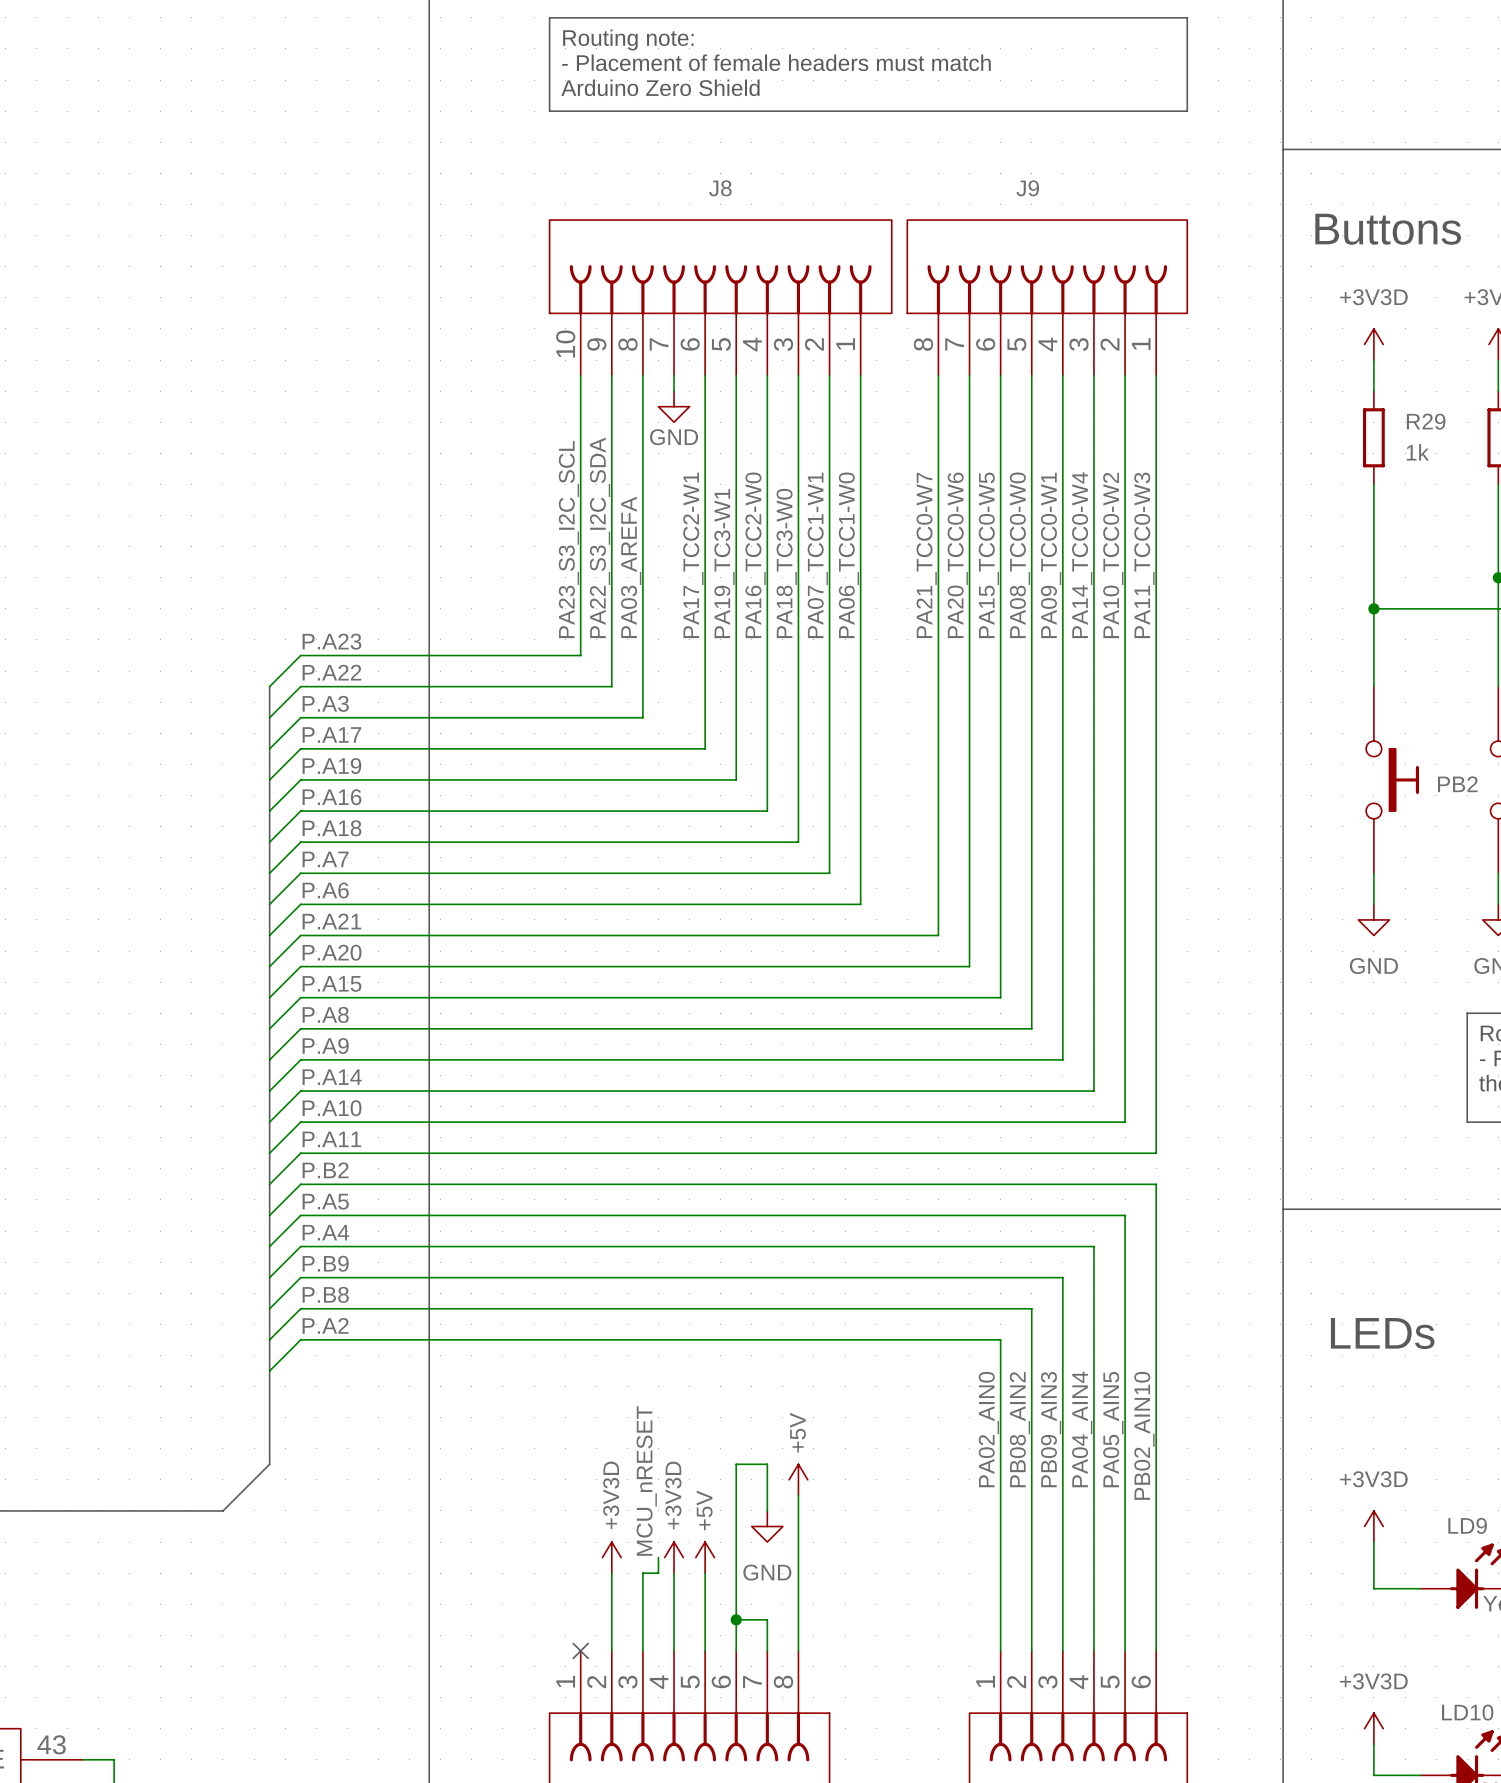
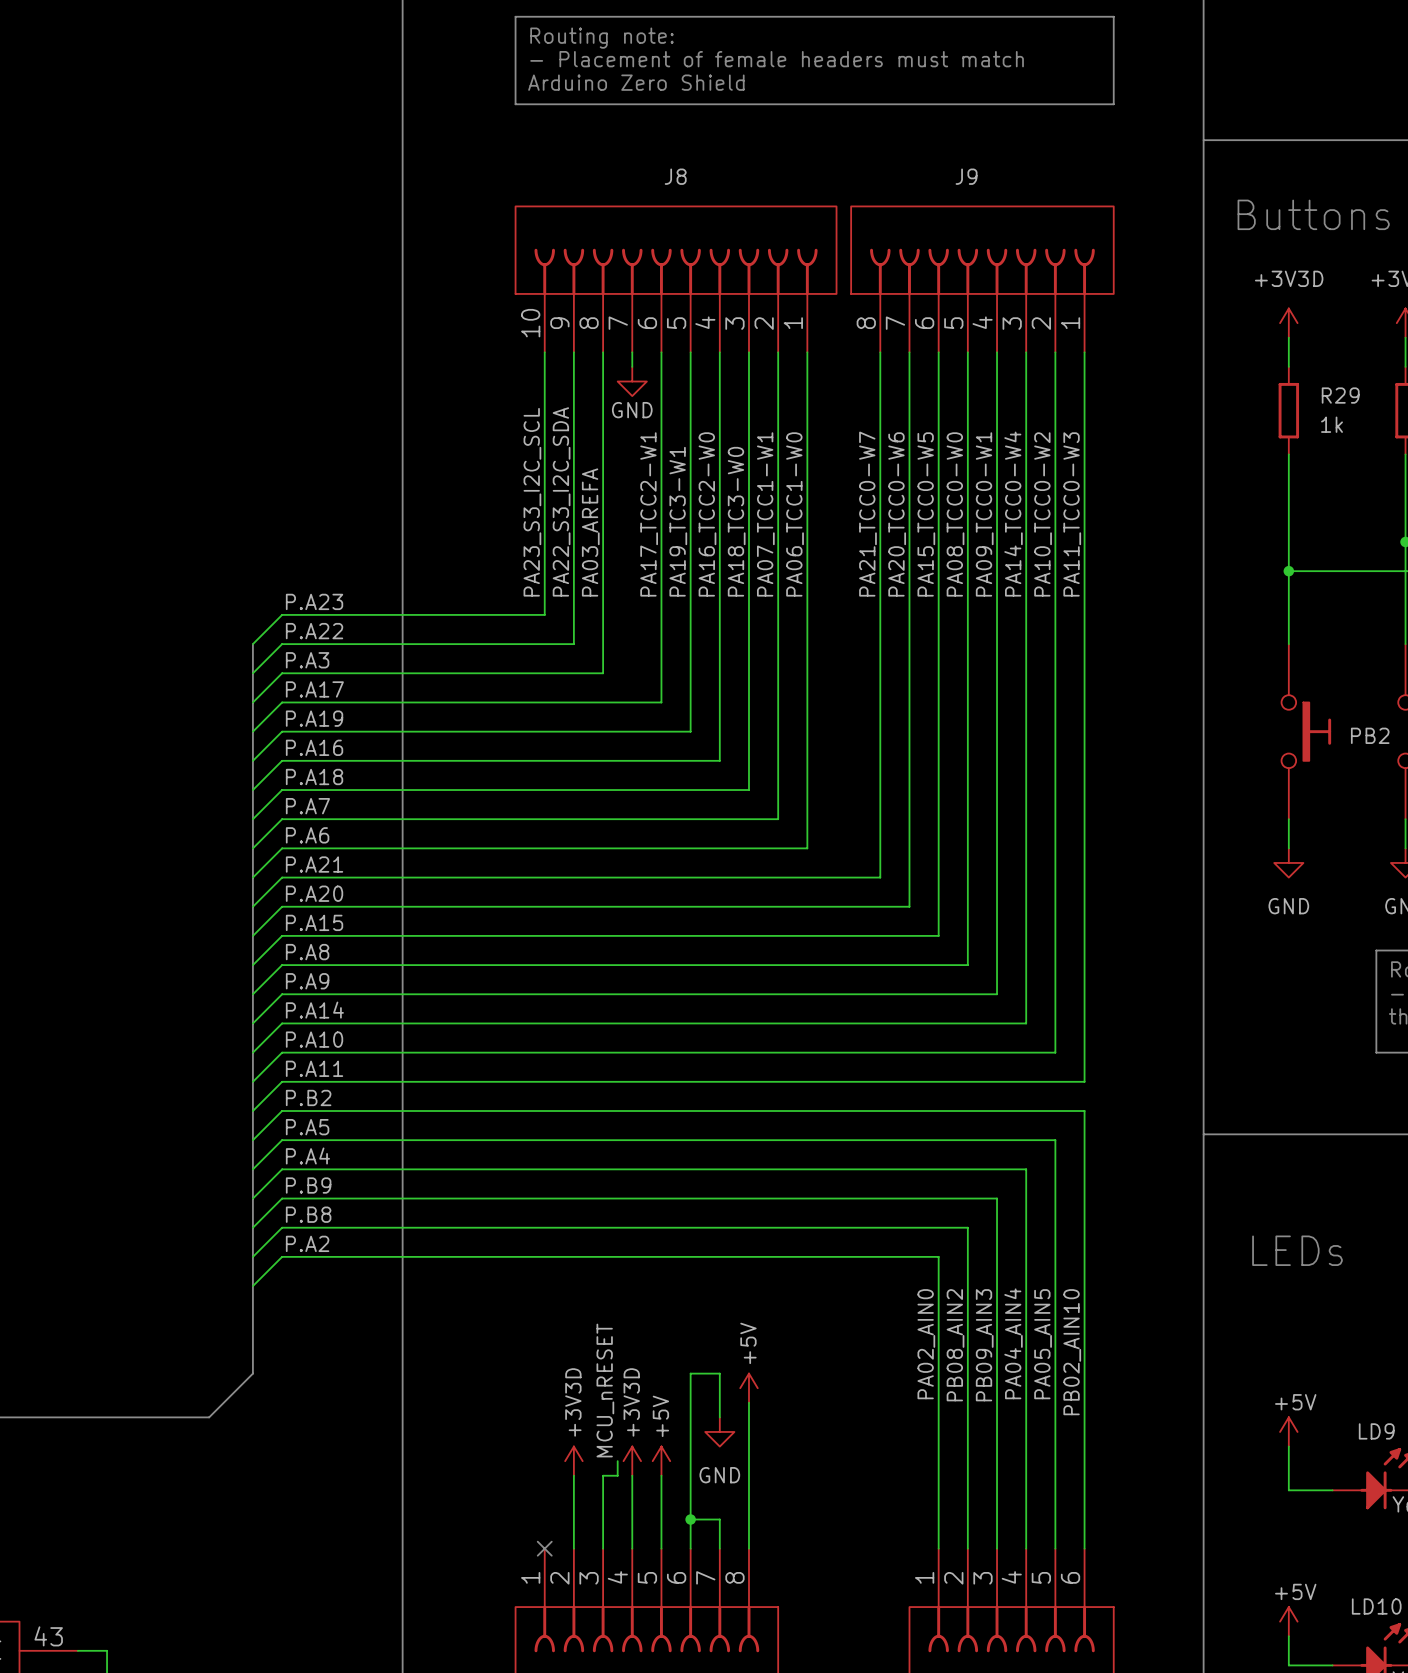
power symbol: +3V3D (1373, 1526) -> +5V (1288, 1431)
power symbol: +3V3D (1373, 1728) -> +5V (1288, 1621)

